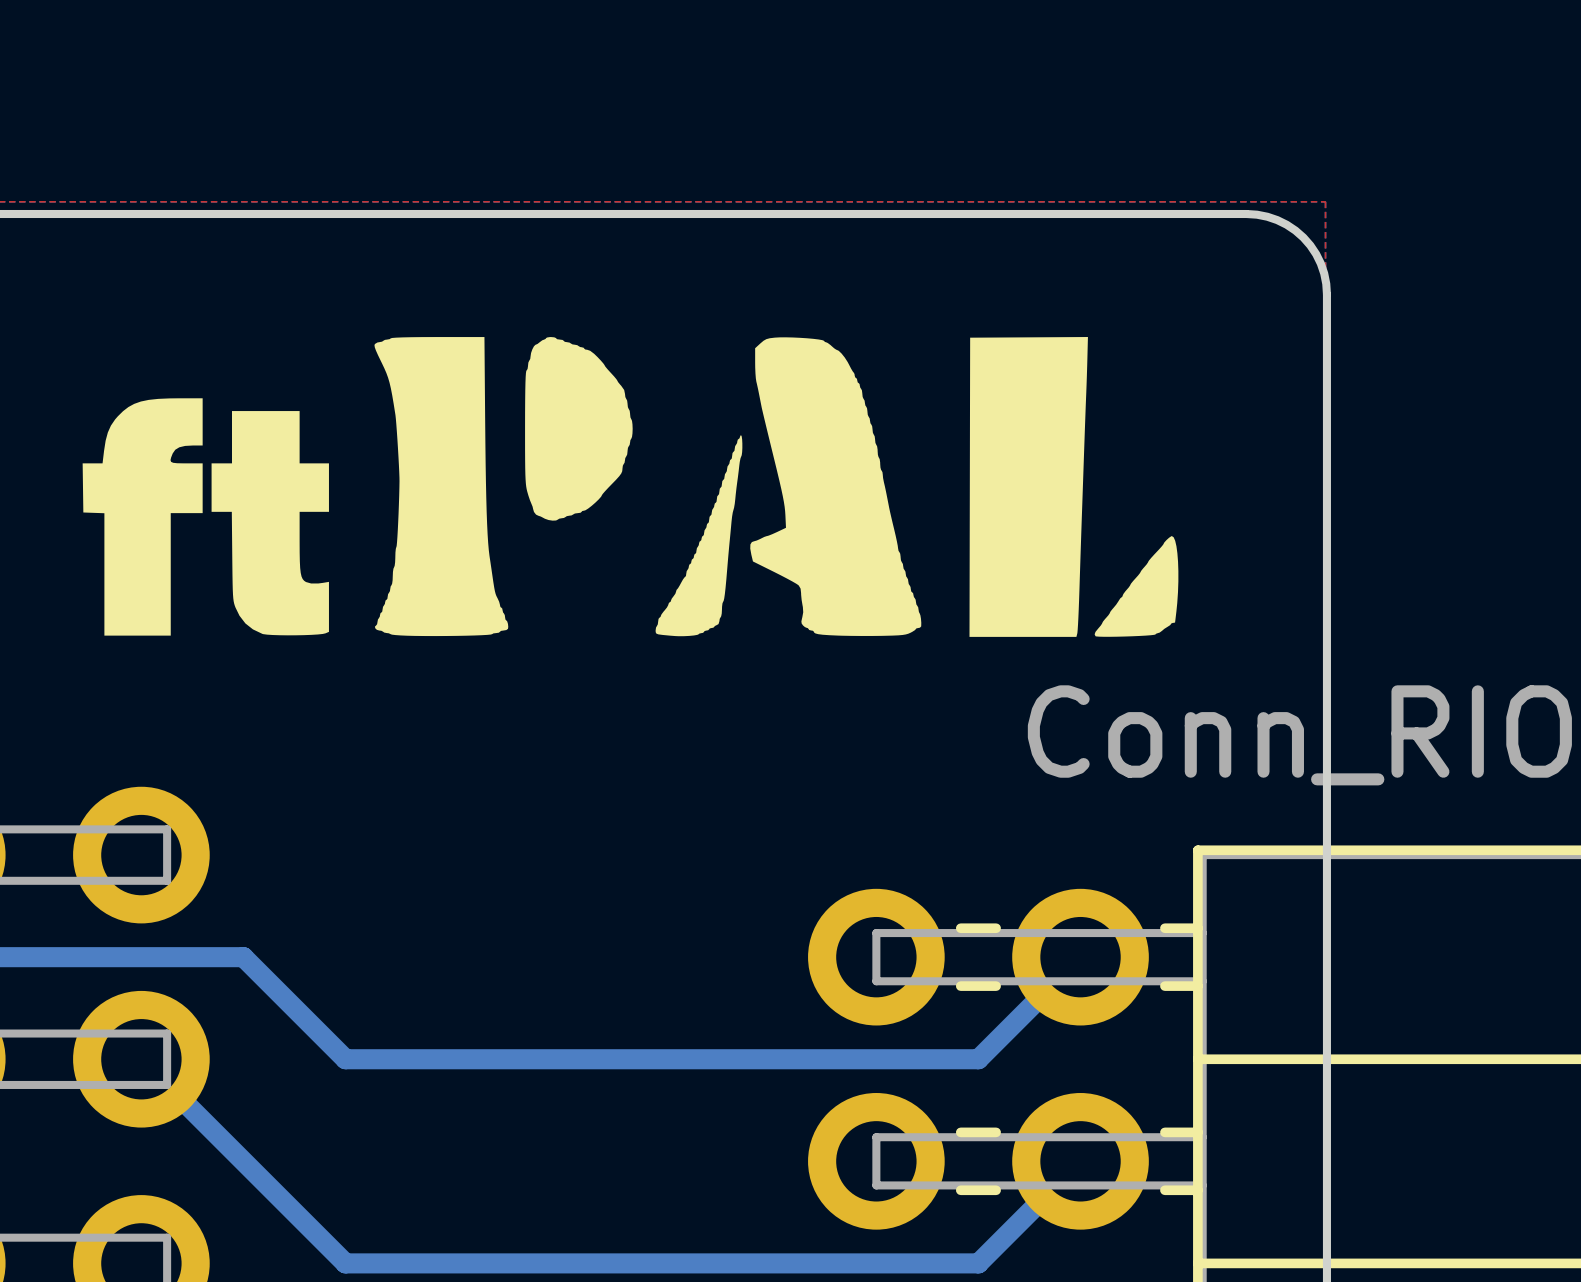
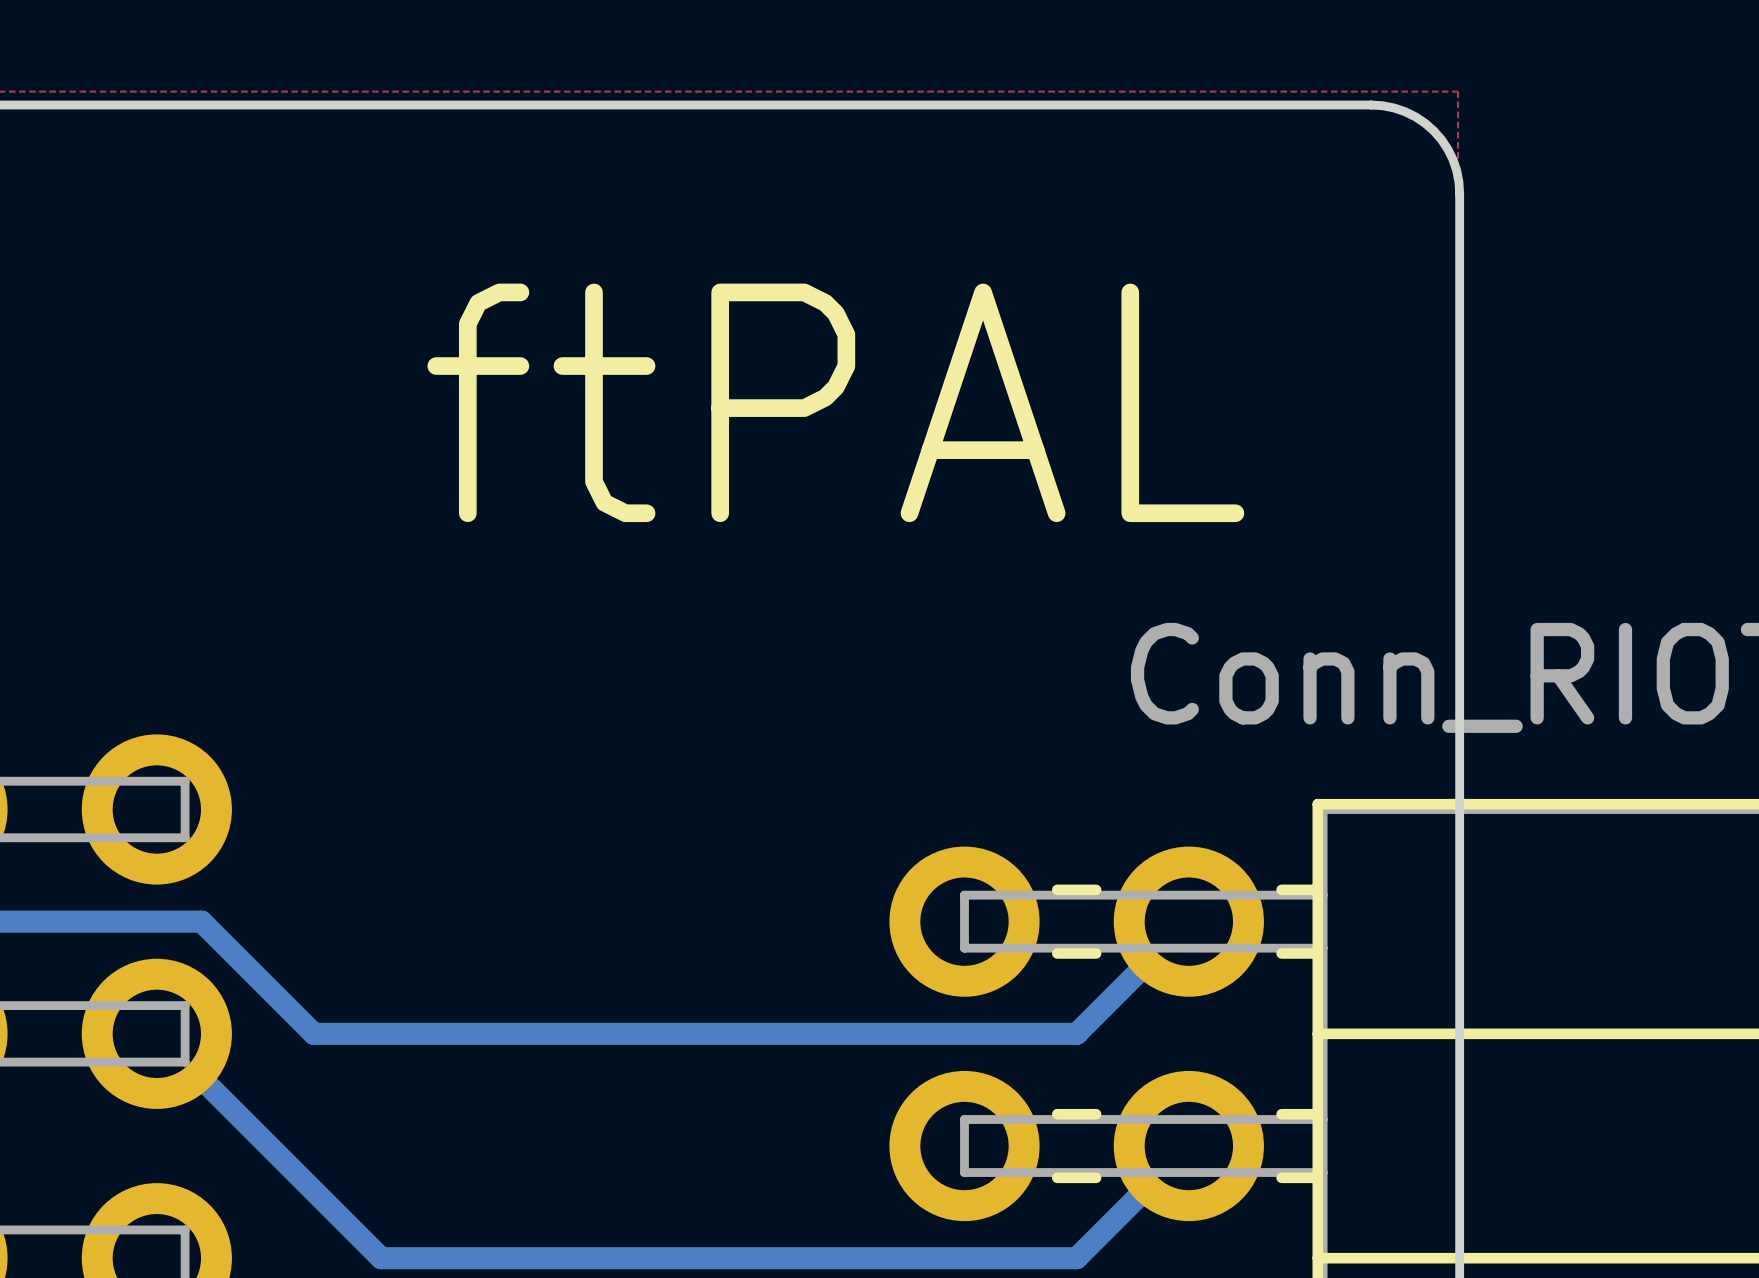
drawing: [82, 337, 1179, 637] -> none
text: none -> ftPAL (835, 402)
bottom track: (182, 957) (243, 957) (345, 1059) -> (201, 921) (313, 1033) (381, 1033)

